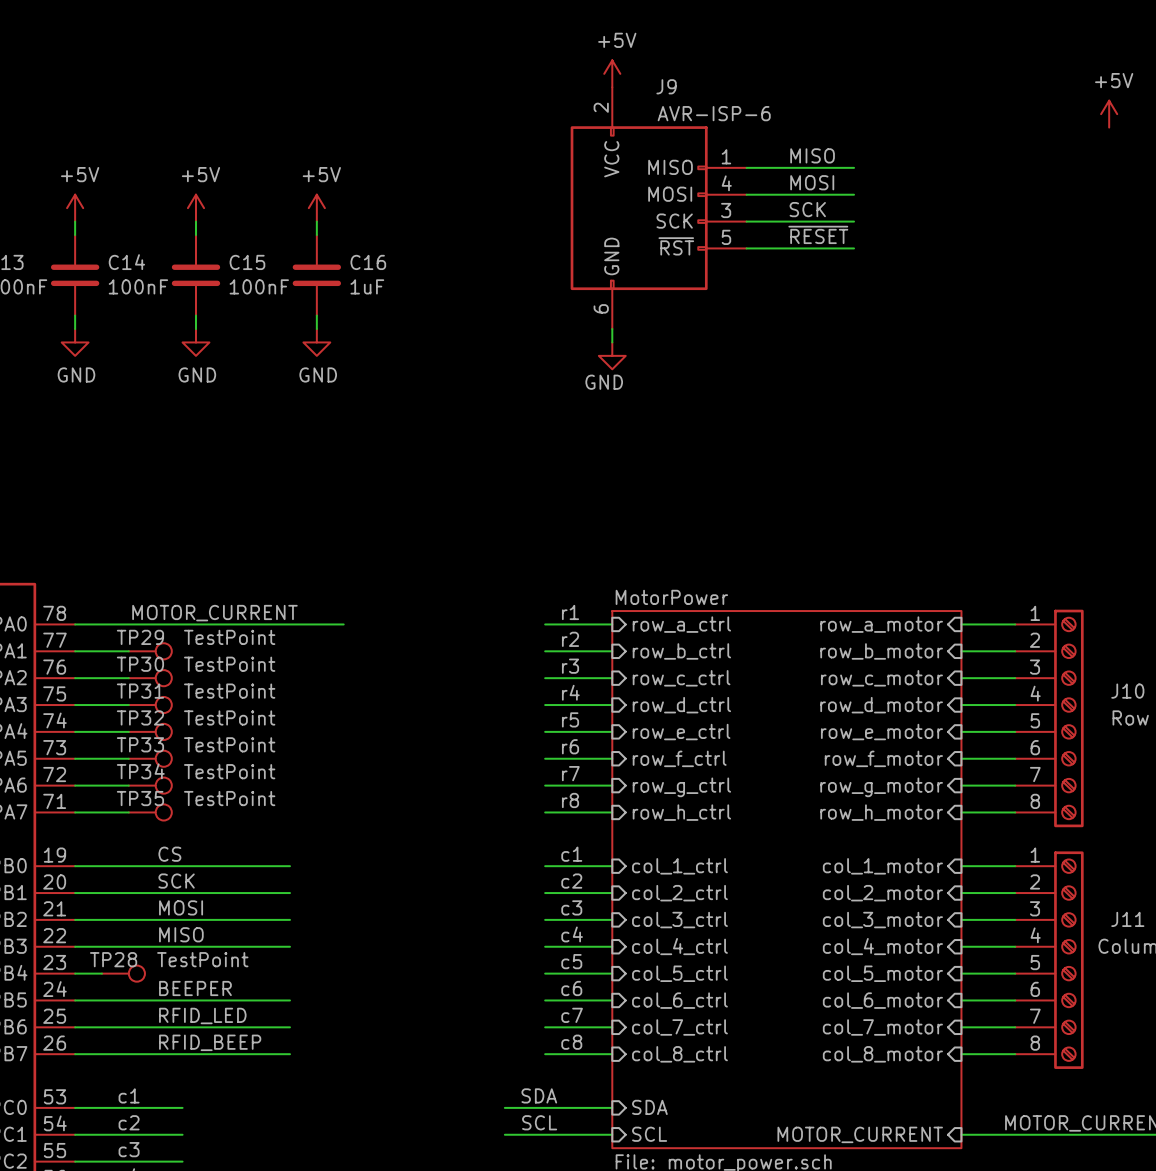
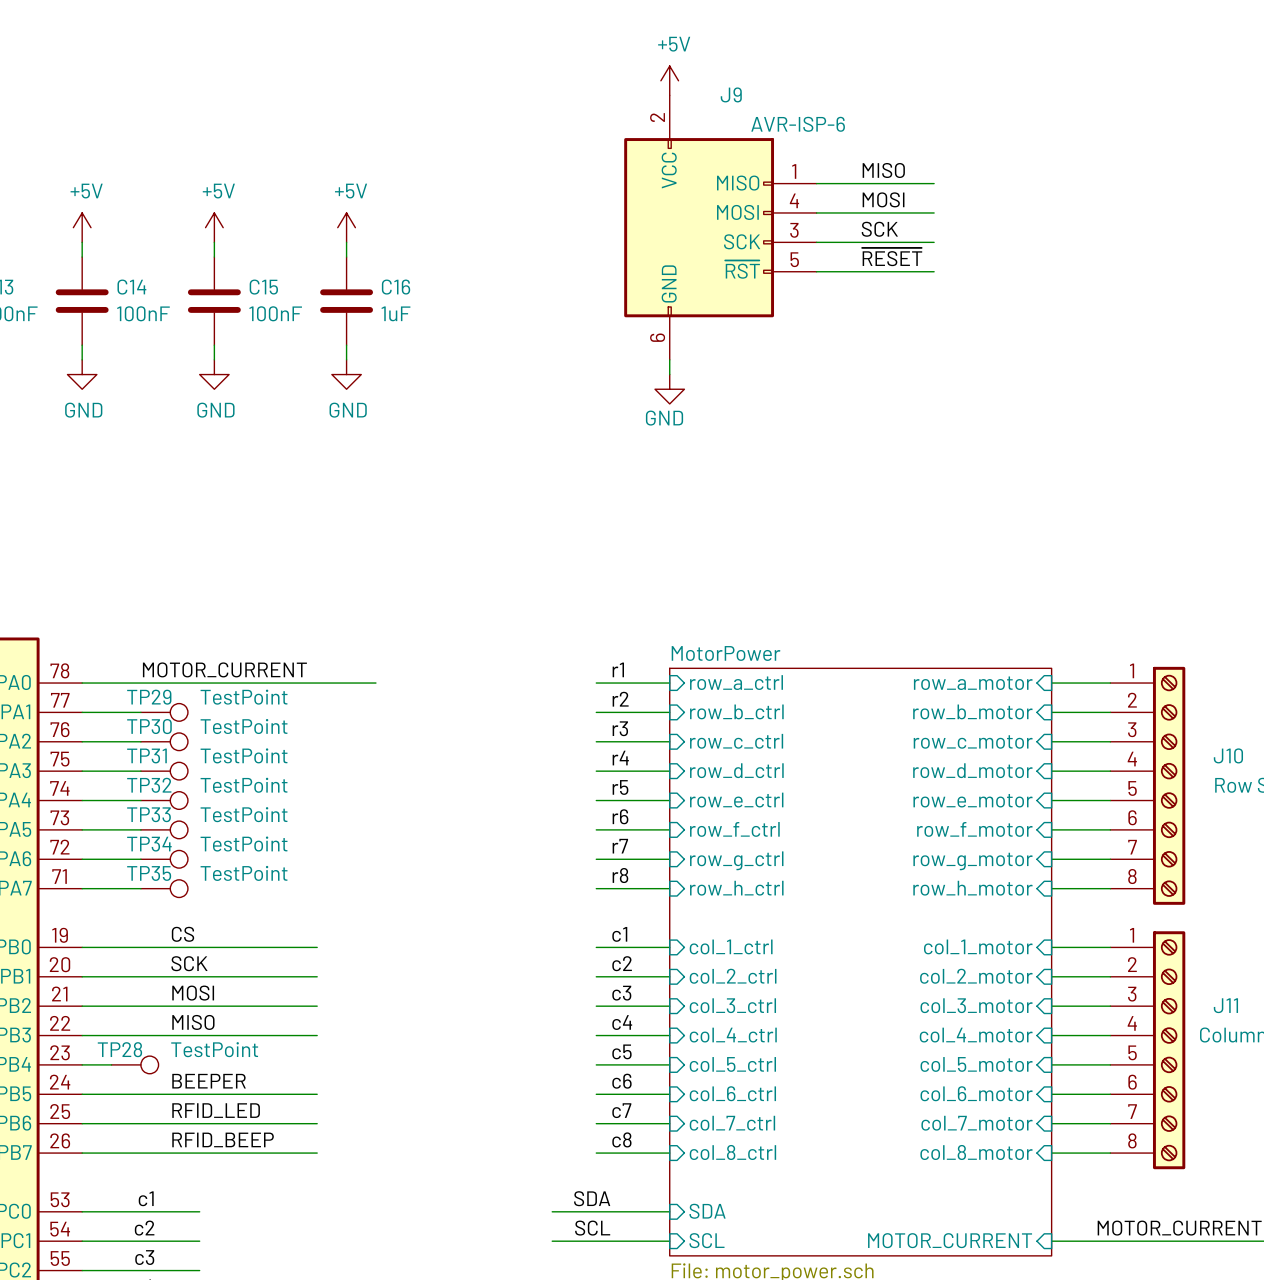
power symbol: +5V (1109, 114) -> none

